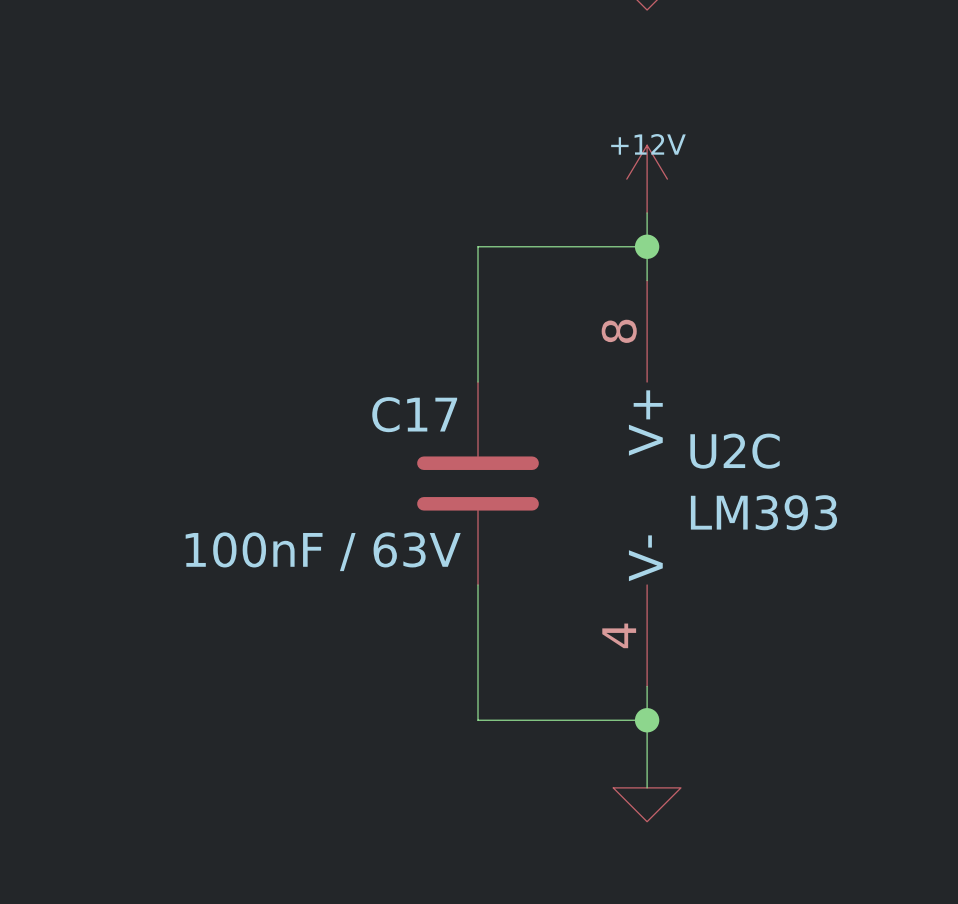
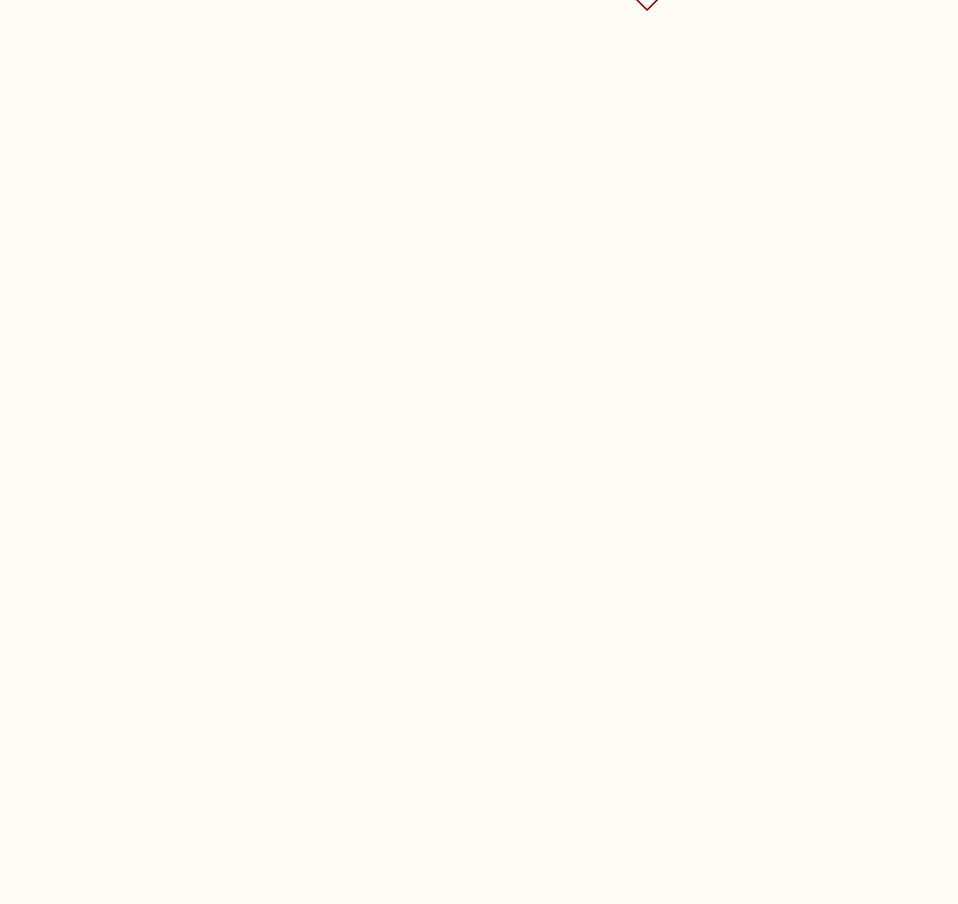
power symbol: +12V (647, 179) -> none
wire: (647, 212) (647, 280) -> none
wire: (647, 246) (478, 246) (478, 382) -> none
junction: (647, 246) -> none
C17: 100nF / 63V (478, 483) -> none
U2C: LM393 (647, 483) -> none
wire: (478, 584) (478, 720) (647, 720) -> none
wire: (647, 686) (647, 787) -> none
junction: (647, 720) -> none
power symbol: (647, 804) -> none

